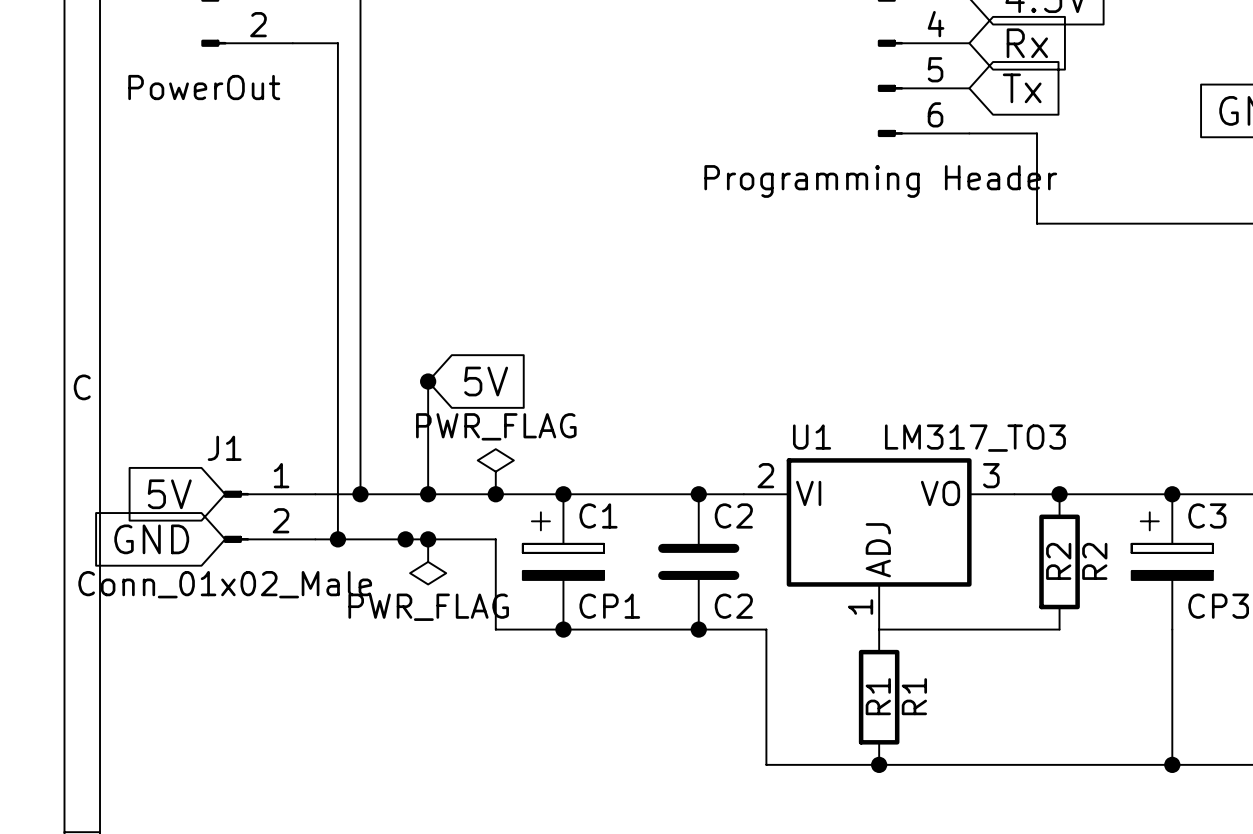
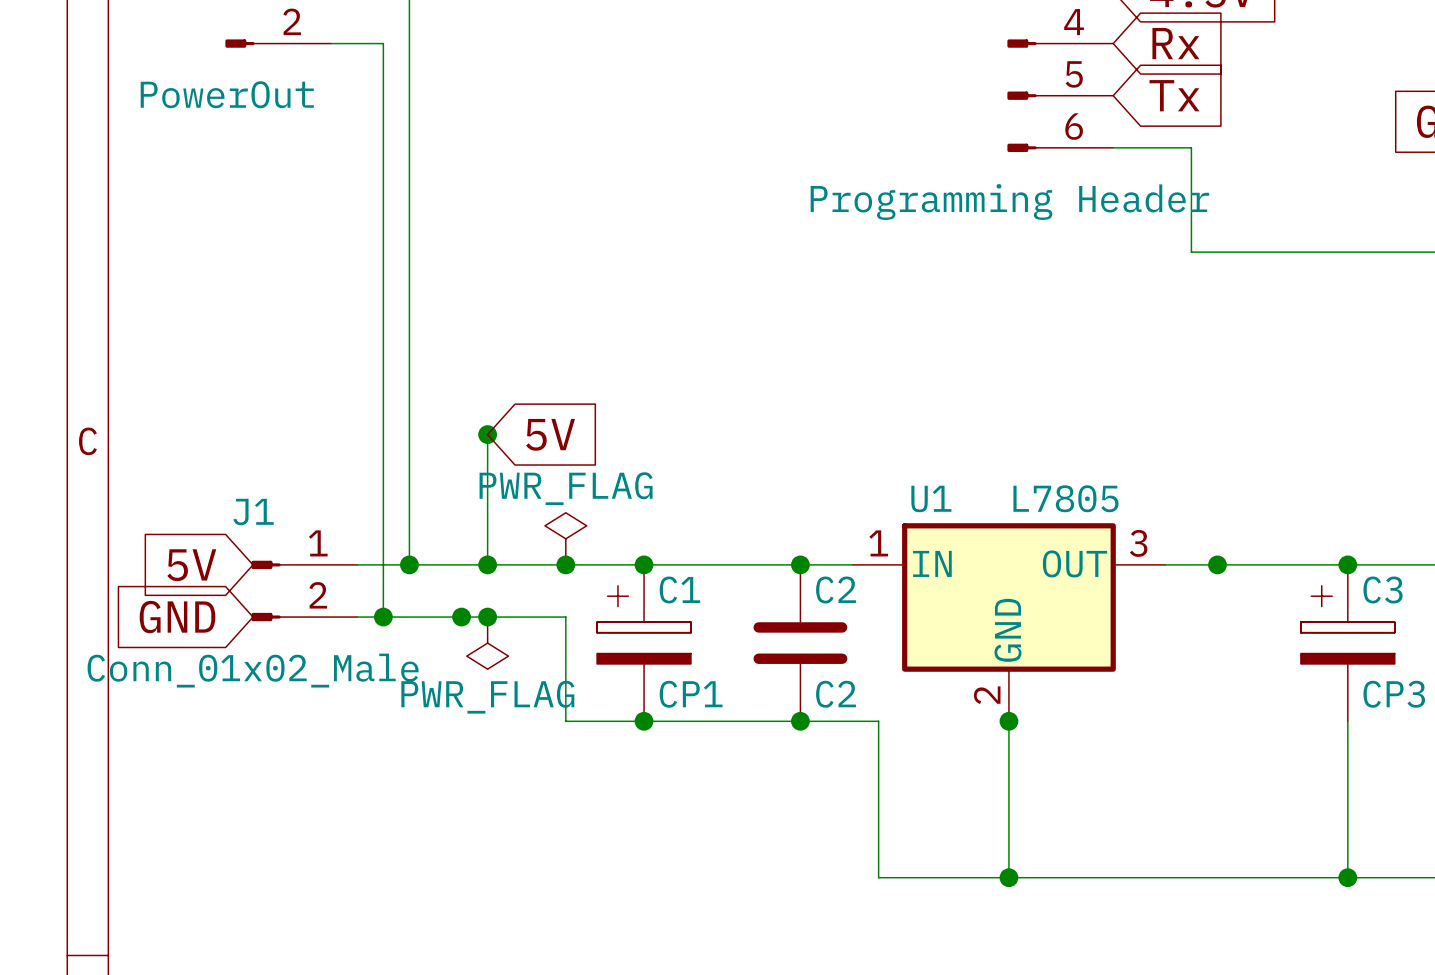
U1 value: LM317_TO3 (975, 438) -> L7805 (1065, 498)
U1 pin number: 2 (765, 475) -> 1 (878, 543)
U1 pin name: VI (808, 493) -> IN (932, 563)
U1 pin name: VO (940, 493) -> OUT (1074, 563)
U1 pin name: ADJ (878, 550) -> GND (1007, 630)
R2: R2 (1059, 561) -> none
U1 pin number: 1 (860, 607) -> 2 (987, 695)
wire: (879, 629) (1059, 629) -> (1008, 721) (1008, 877)
junction: none -> (1008, 721)
R1: R1 (879, 697) -> none

